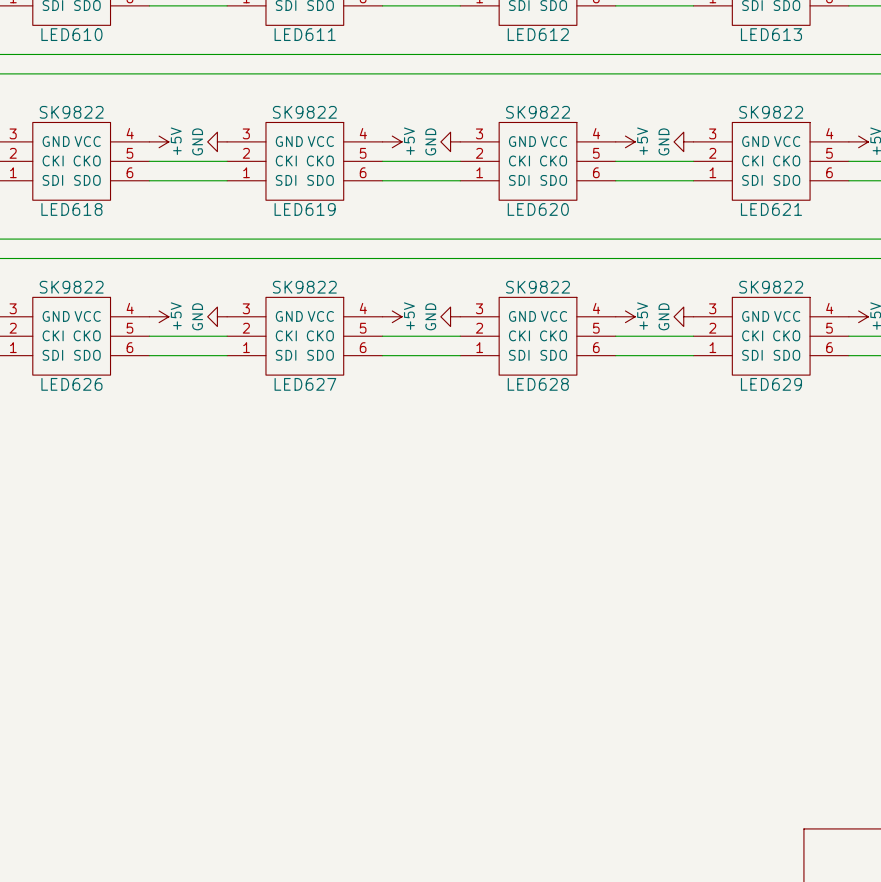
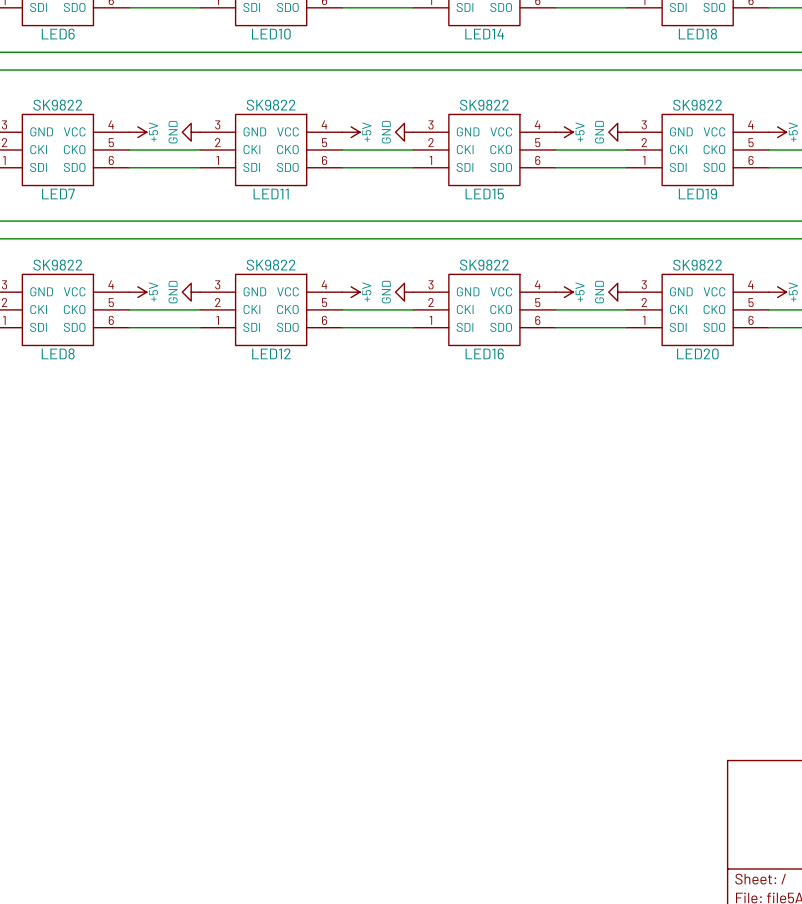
LED610 name: LED610 (71, 34) -> LED6 (58, 34)
LED611 name: LED611 (305, 34) -> LED10 (271, 34)
LED612 name: LED612 (538, 34) -> LED14 (484, 34)
LED613 name: LED613 (771, 34) -> LED18 (697, 34)
LED618 name: LED618 (71, 209) -> LED7 (58, 194)
LED619 name: LED619 (305, 209) -> LED11 (271, 194)
LED620 name: LED620 (538, 209) -> LED15 (484, 194)
LED621 name: LED621 (771, 209) -> LED19 (697, 194)
LED626 name: LED626 (71, 384) -> LED8 (58, 353)
LED627 name: LED627 (305, 384) -> LED12 (271, 353)
LED628 name: LED628 (538, 384) -> LED16 (484, 353)
LED629 name: LED629 (771, 384) -> LED20 (697, 353)

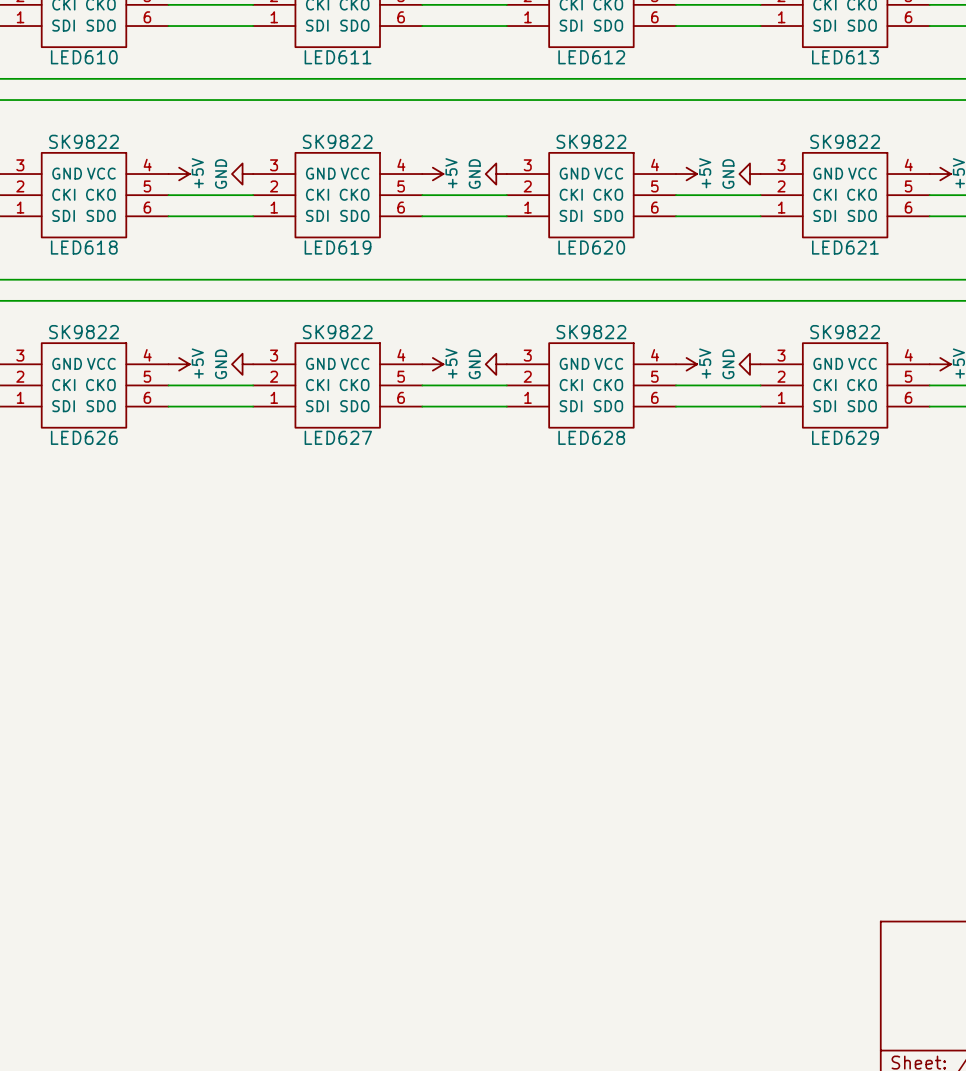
LED6 name: LED6 (58, 34) -> LED610 (84, 57)
LED10 name: LED10 (271, 34) -> LED611 (338, 57)
LED14 name: LED14 (484, 34) -> LED612 (591, 57)
LED18 name: LED18 (697, 34) -> LED613 (845, 57)
LED7 name: LED7 (58, 194) -> LED618 (84, 247)
LED11 name: LED11 (271, 194) -> LED619 (338, 247)
LED15 name: LED15 (484, 194) -> LED620 (591, 247)
LED19 name: LED19 (697, 194) -> LED621 (845, 247)
LED8 name: LED8 (58, 353) -> LED626 (84, 437)
LED12 name: LED12 (271, 353) -> LED627 (338, 437)
LED16 name: LED16 (484, 353) -> LED628 (591, 437)
LED20 name: LED20 (697, 353) -> LED629 (845, 437)

